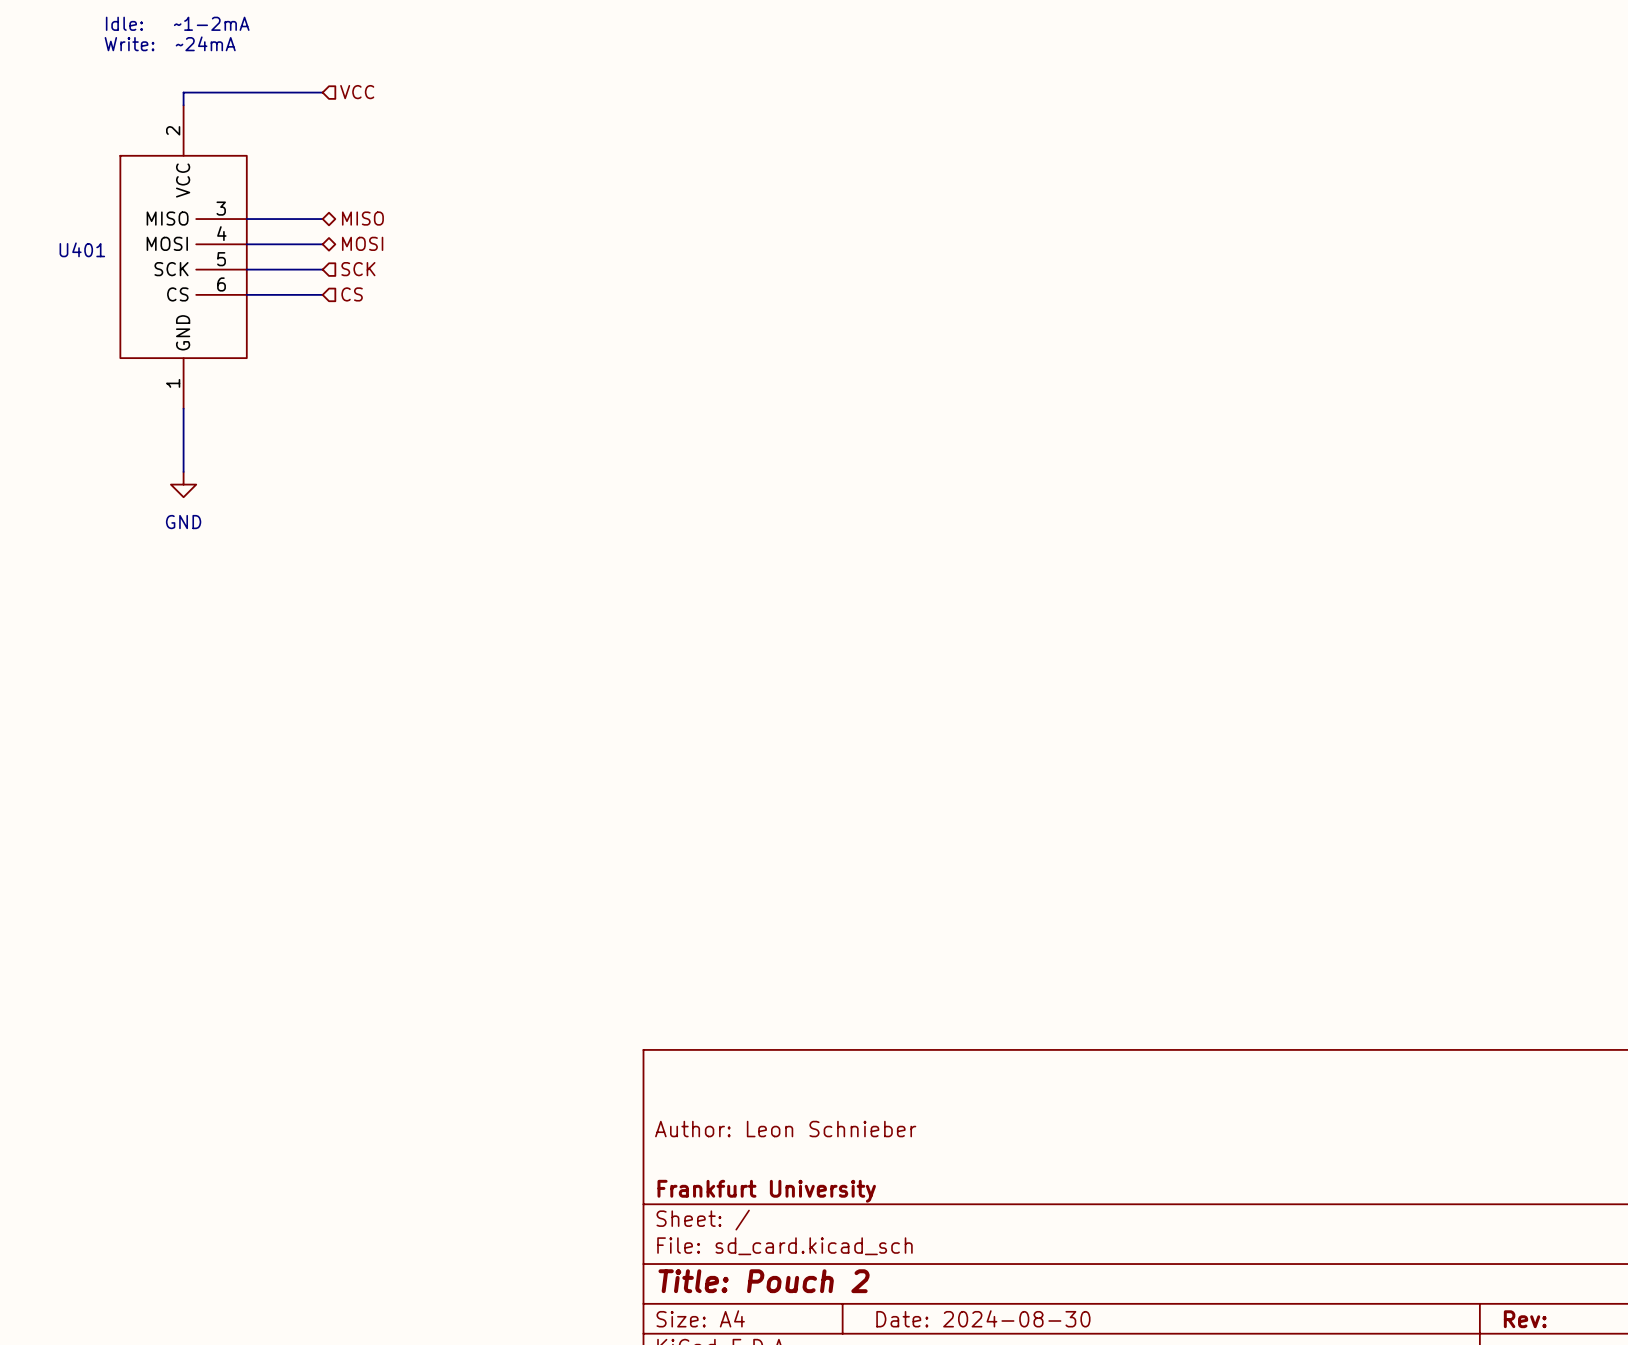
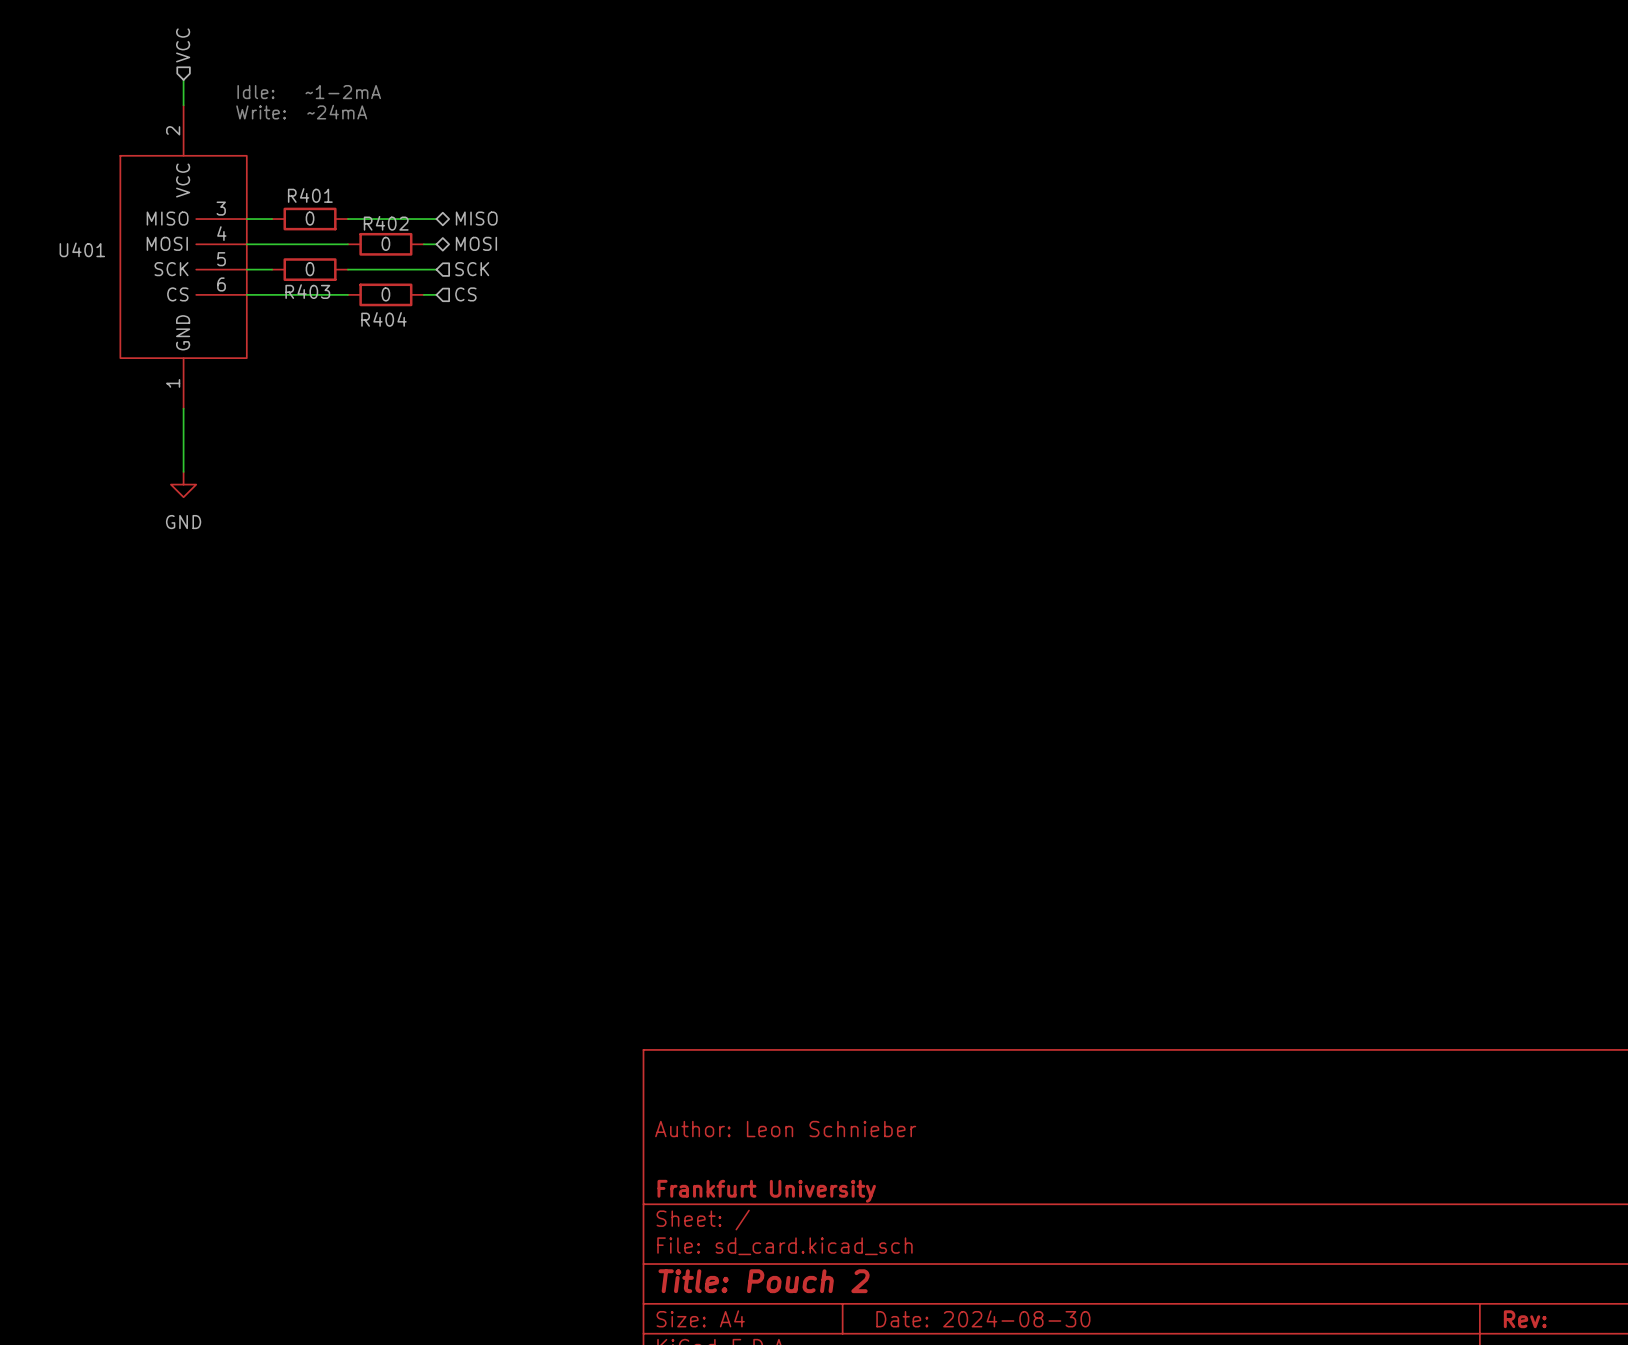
text position: Idle: ~1-2mA (177, 23) -> Idle: ~1-2mA (309, 92)
text position: Write: ~24mA (170, 43) -> Write: ~24mA (301, 112)
wire: (183, 92) (322, 92) -> (183, 92) (183, 79)
hierarchical label rotation: 0° (357, 92) -> 90° counterclockwise (183, 45)
hierarchical label position: VCC (357, 92) -> VCC (183, 45)
hierarchical label position: MISO (362, 218) -> MISO (476, 218)
wire: (272, 219) (322, 219) -> none
R401: none -> 0 (310, 219)
wire: none -> (347, 219) (436, 219)
hierarchical label position: MOSI (362, 243) -> MOSI (476, 243)
wire: none -> (322, 244) (347, 244)
R402: none -> 0 (385, 244)
wire: none -> (423, 244) (436, 244)
wire: (272, 269) (322, 269) -> none
R403: none -> 0 (310, 269)
wire: none -> (347, 269) (436, 269)
hierarchical label position: SCK (358, 269) -> SCK (472, 269)
wire: none -> (322, 294) (347, 294)
hierarchical label position: CS (352, 294) -> CS (465, 294)
R404: none -> 0 (385, 294)
wire: none -> (423, 294) (436, 294)

